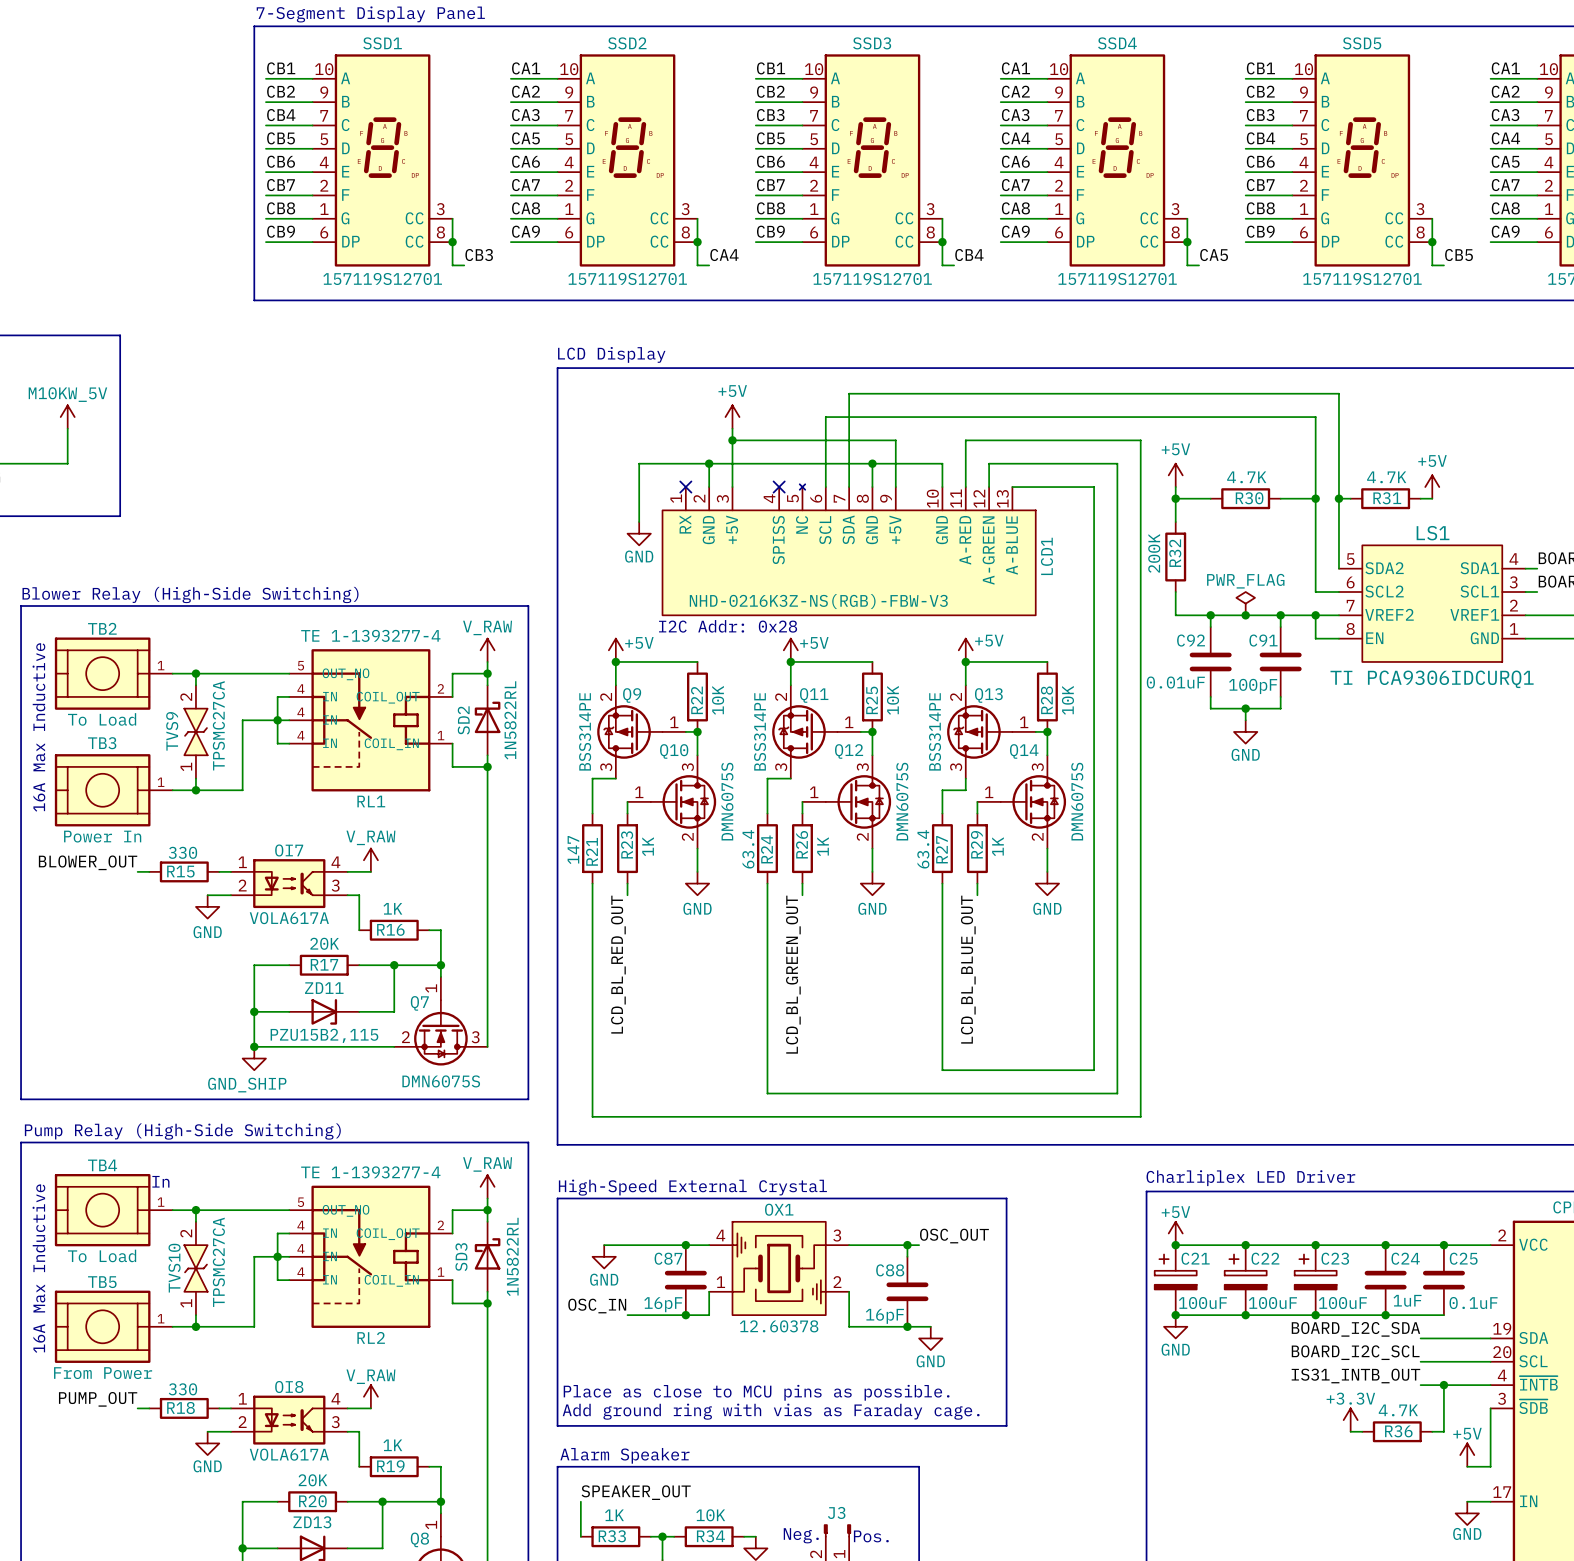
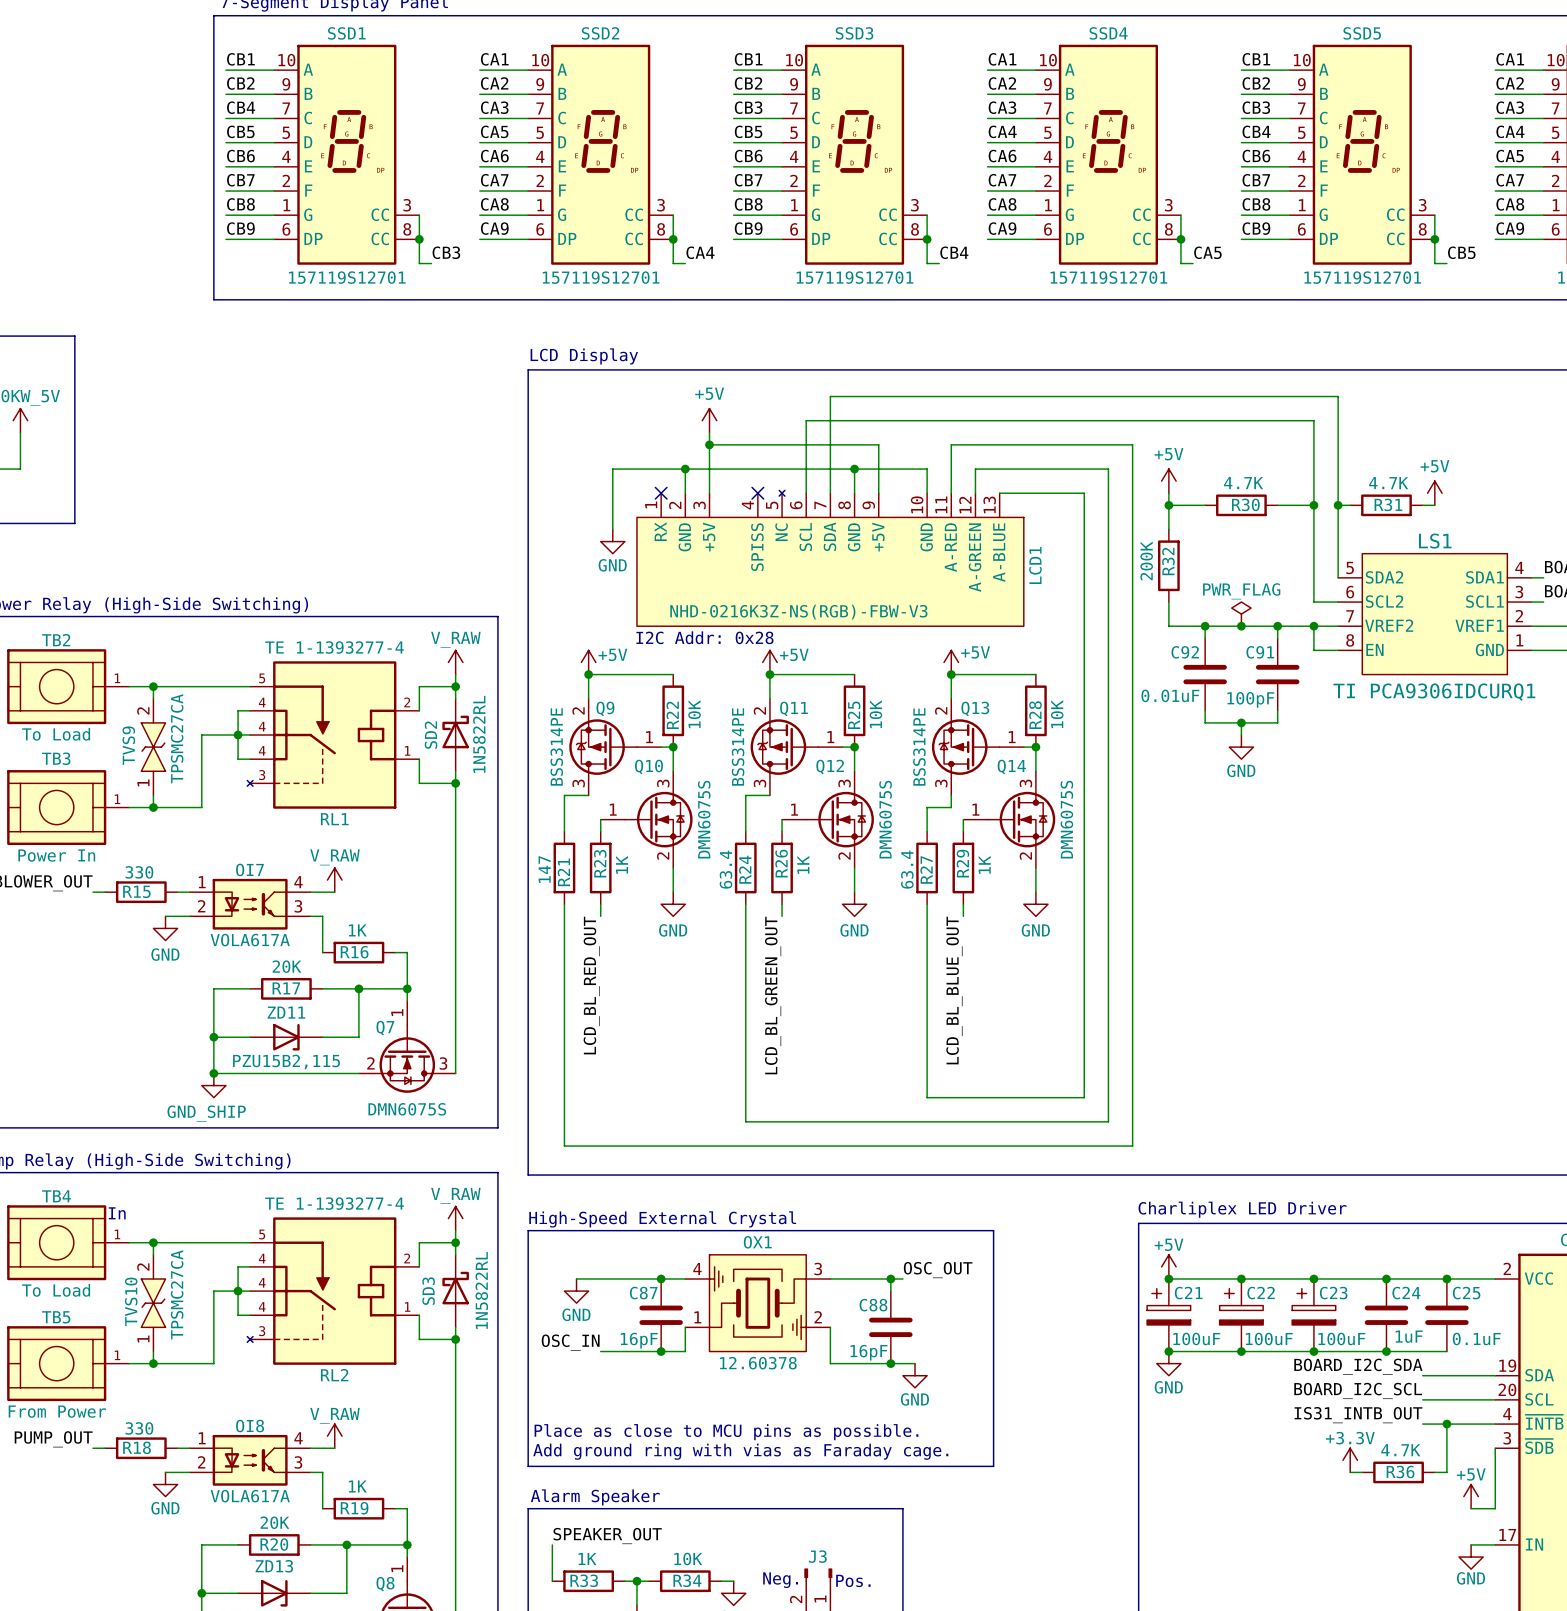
RL1 symbol: [289, 649, 453, 792] -> [247, 661, 420, 809]
RL2 symbol: [289, 1185, 453, 1328] -> [247, 1217, 420, 1365]

